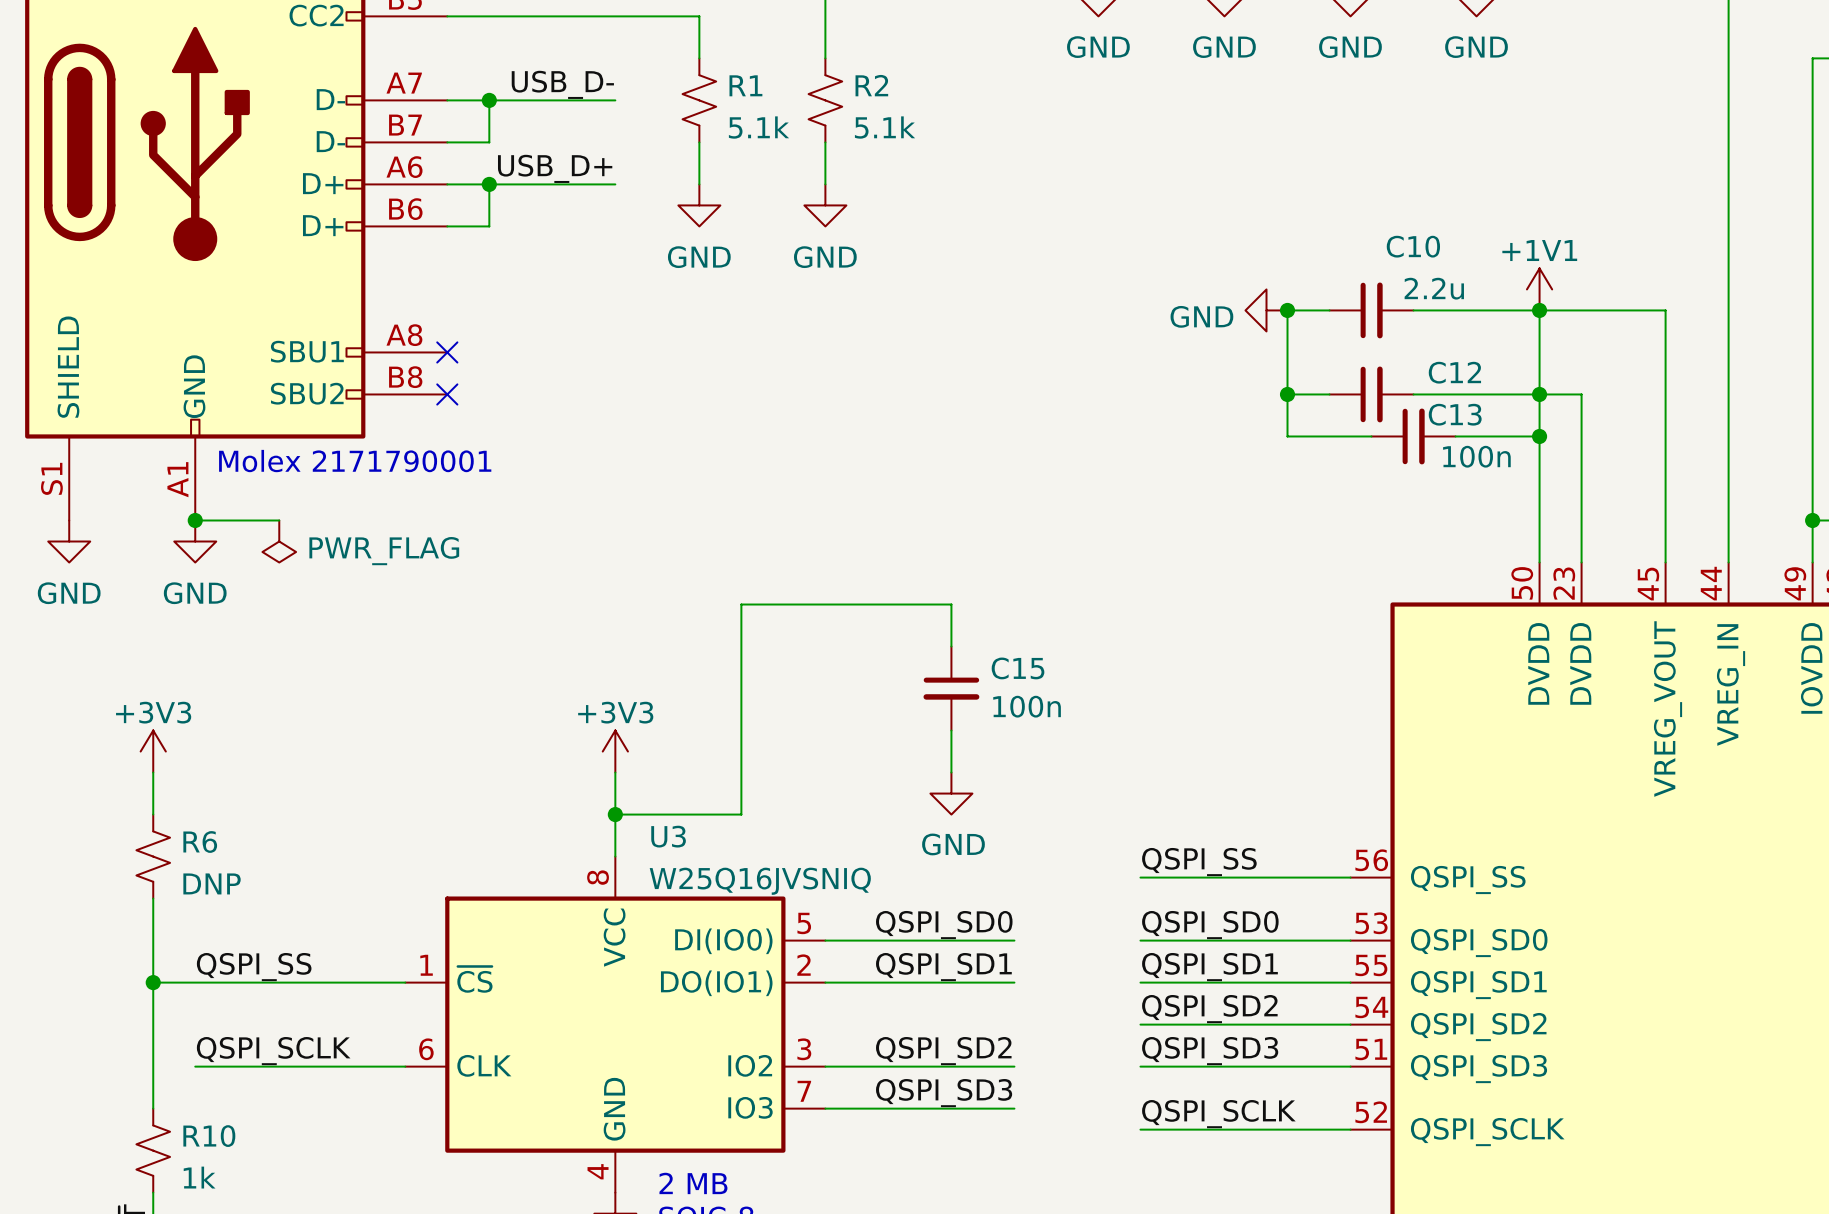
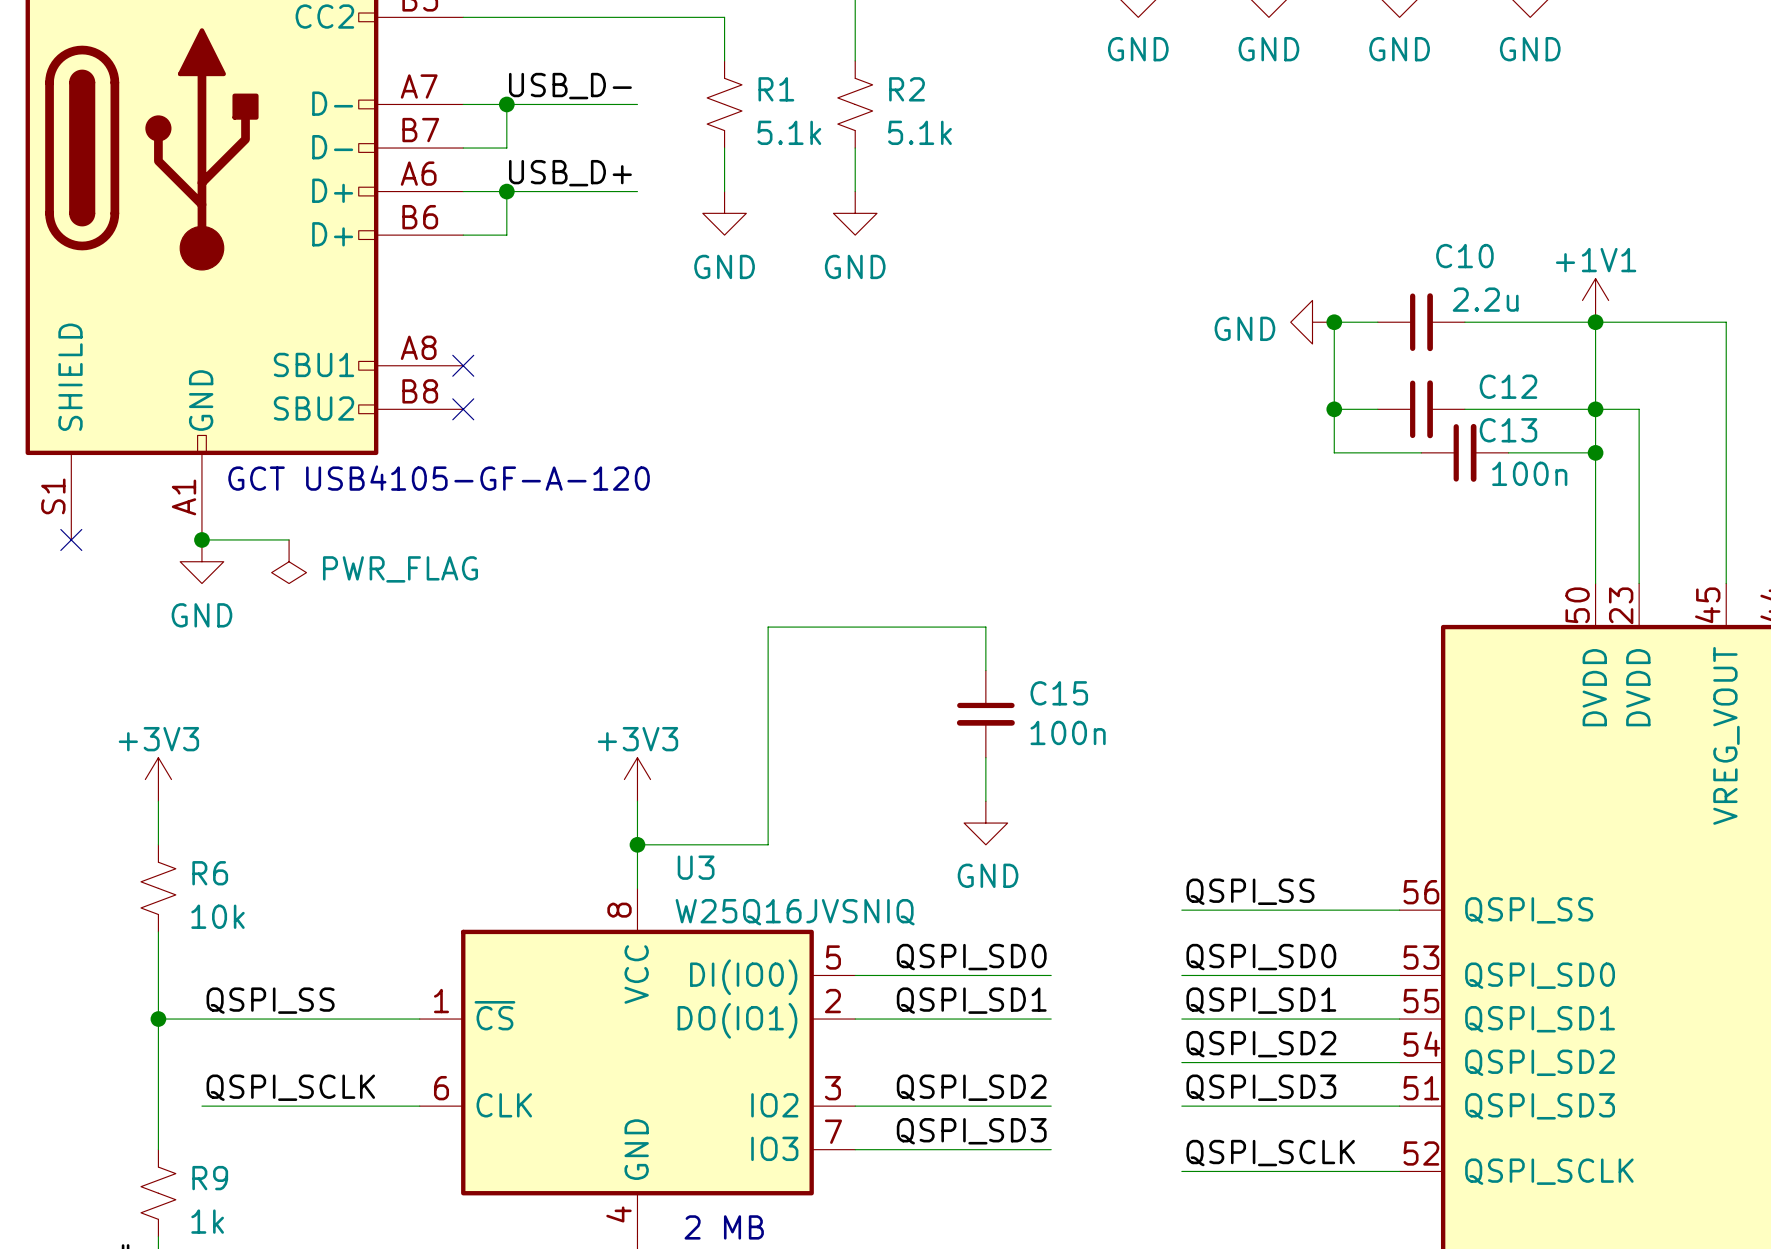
text: Molex 2171790001 (355, 461) -> GCT USB4105-GF-A-120 (439, 478)
no-connect mark: none -> (71, 539)
power symbol: GND (69, 541) -> none
R6 value: DNP (212, 883) -> 10k (217, 916)
R10 name: R10 (209, 1136) -> R9 (210, 1178)

